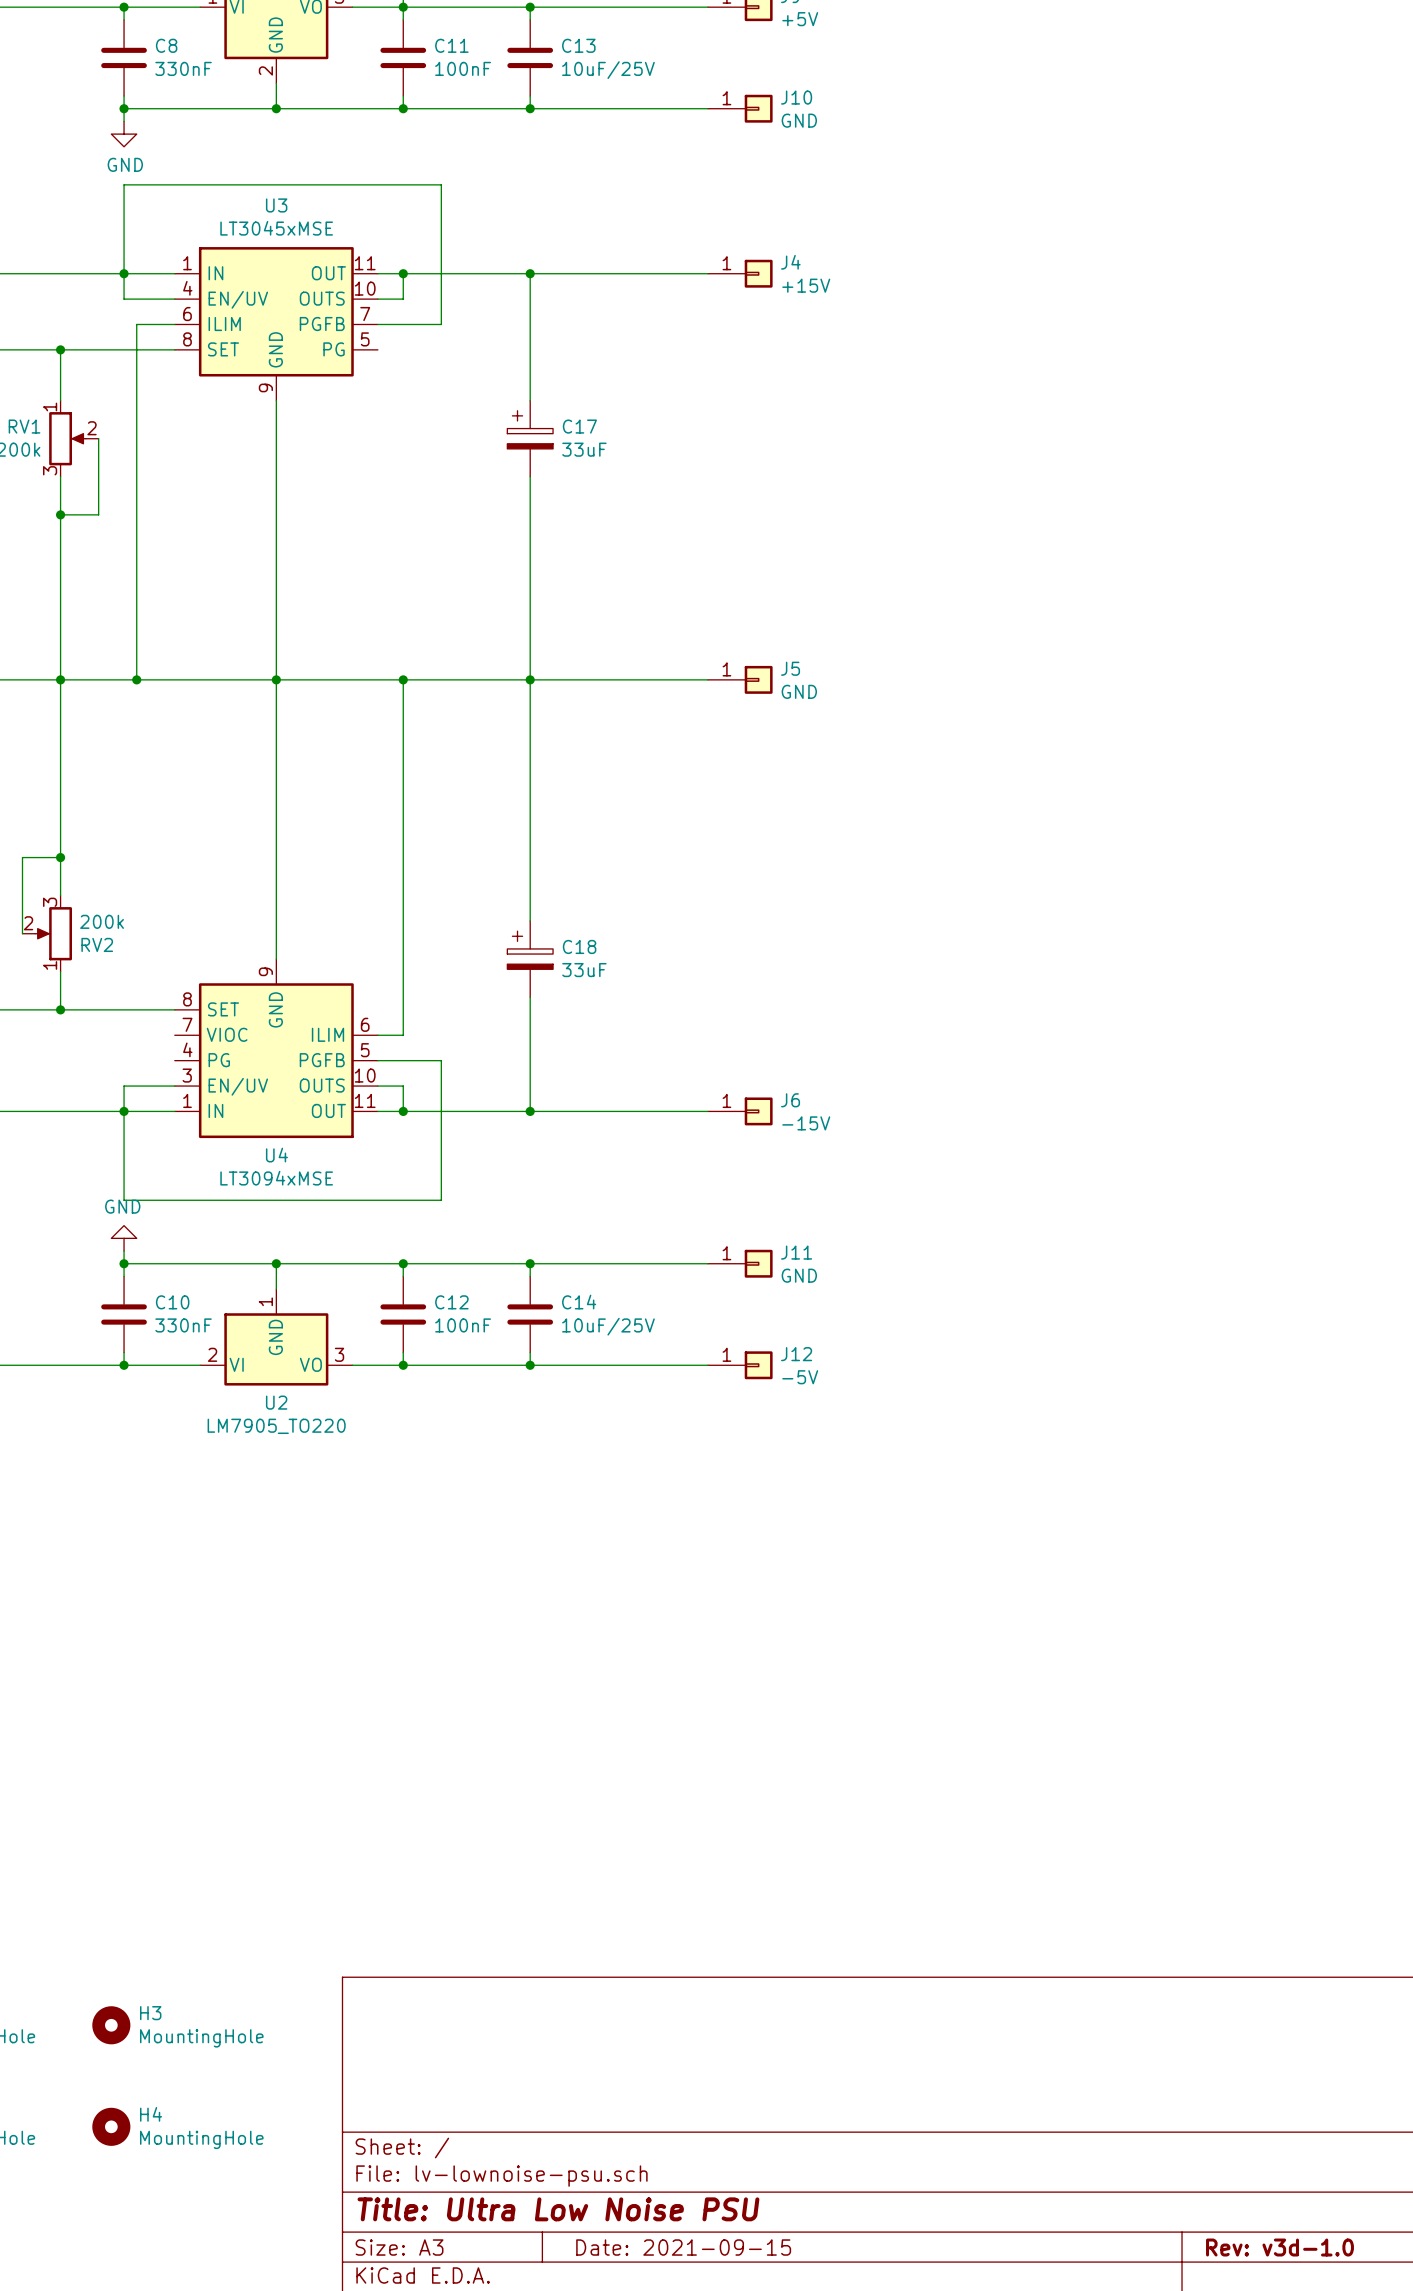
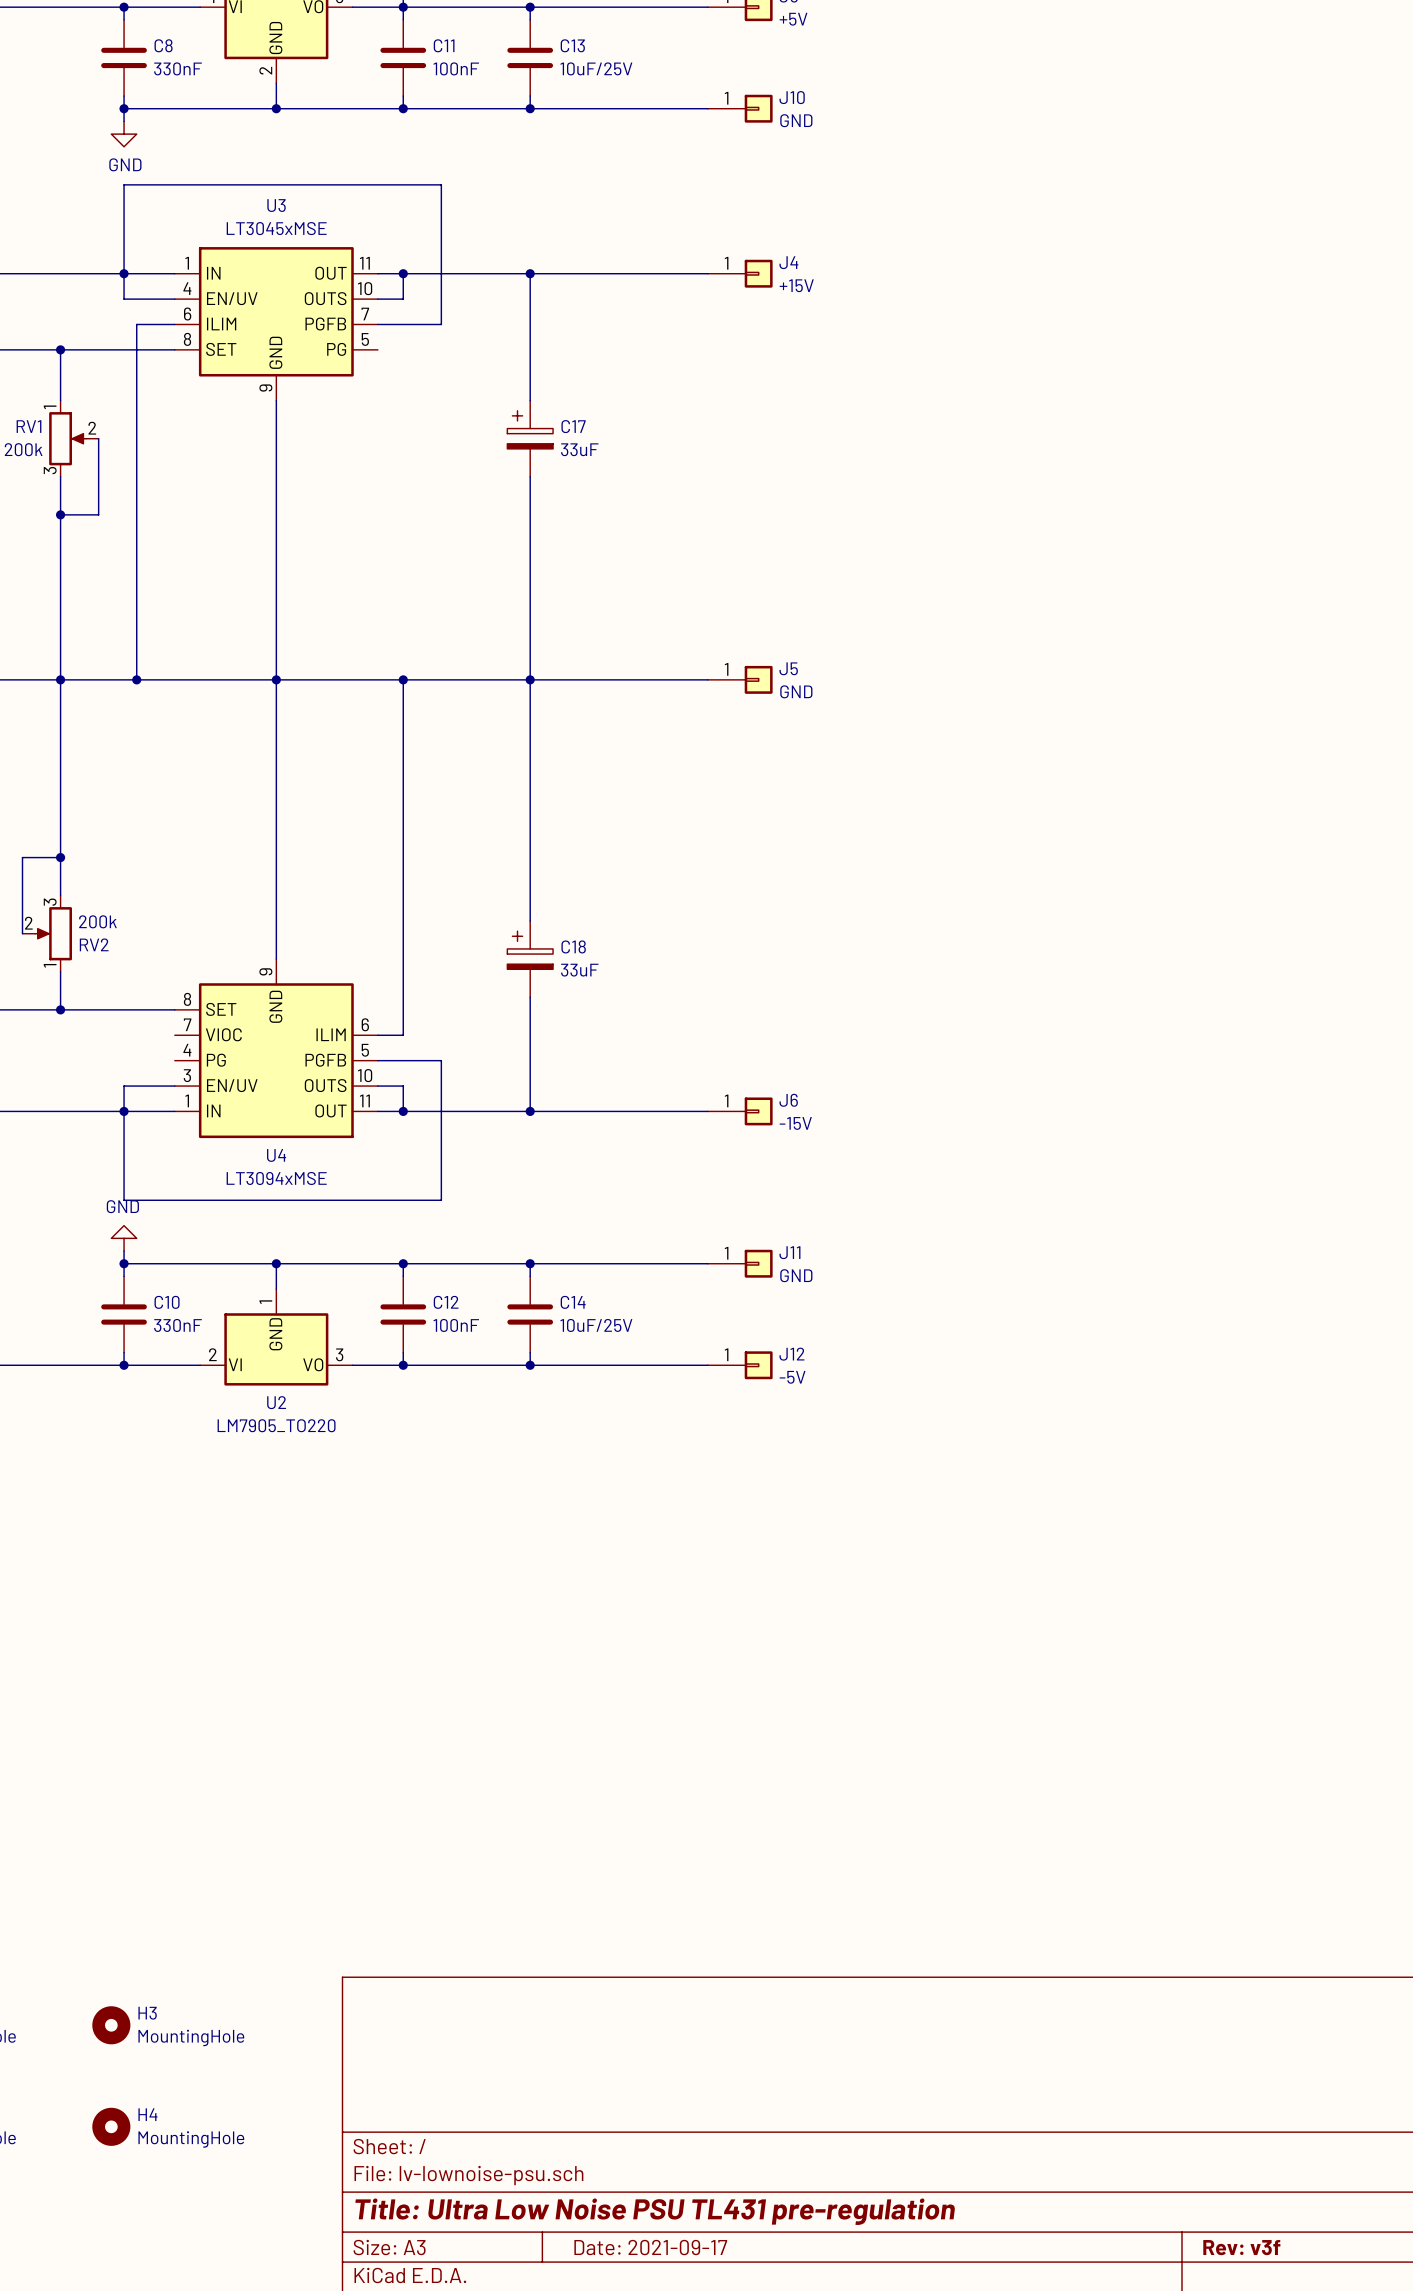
title block: Title: Ultra Low Noise PSU (558, 2209) -> Title: Ultra Low Noise PSU TL431 pre-regulation (655, 2211)
title block: Date: 2021-09-15 (683, 2247) -> Date: 2021-09-17 (650, 2247)
title block: Rev: v3d-1.0 (1279, 2247) -> Rev: v3f (1241, 2247)

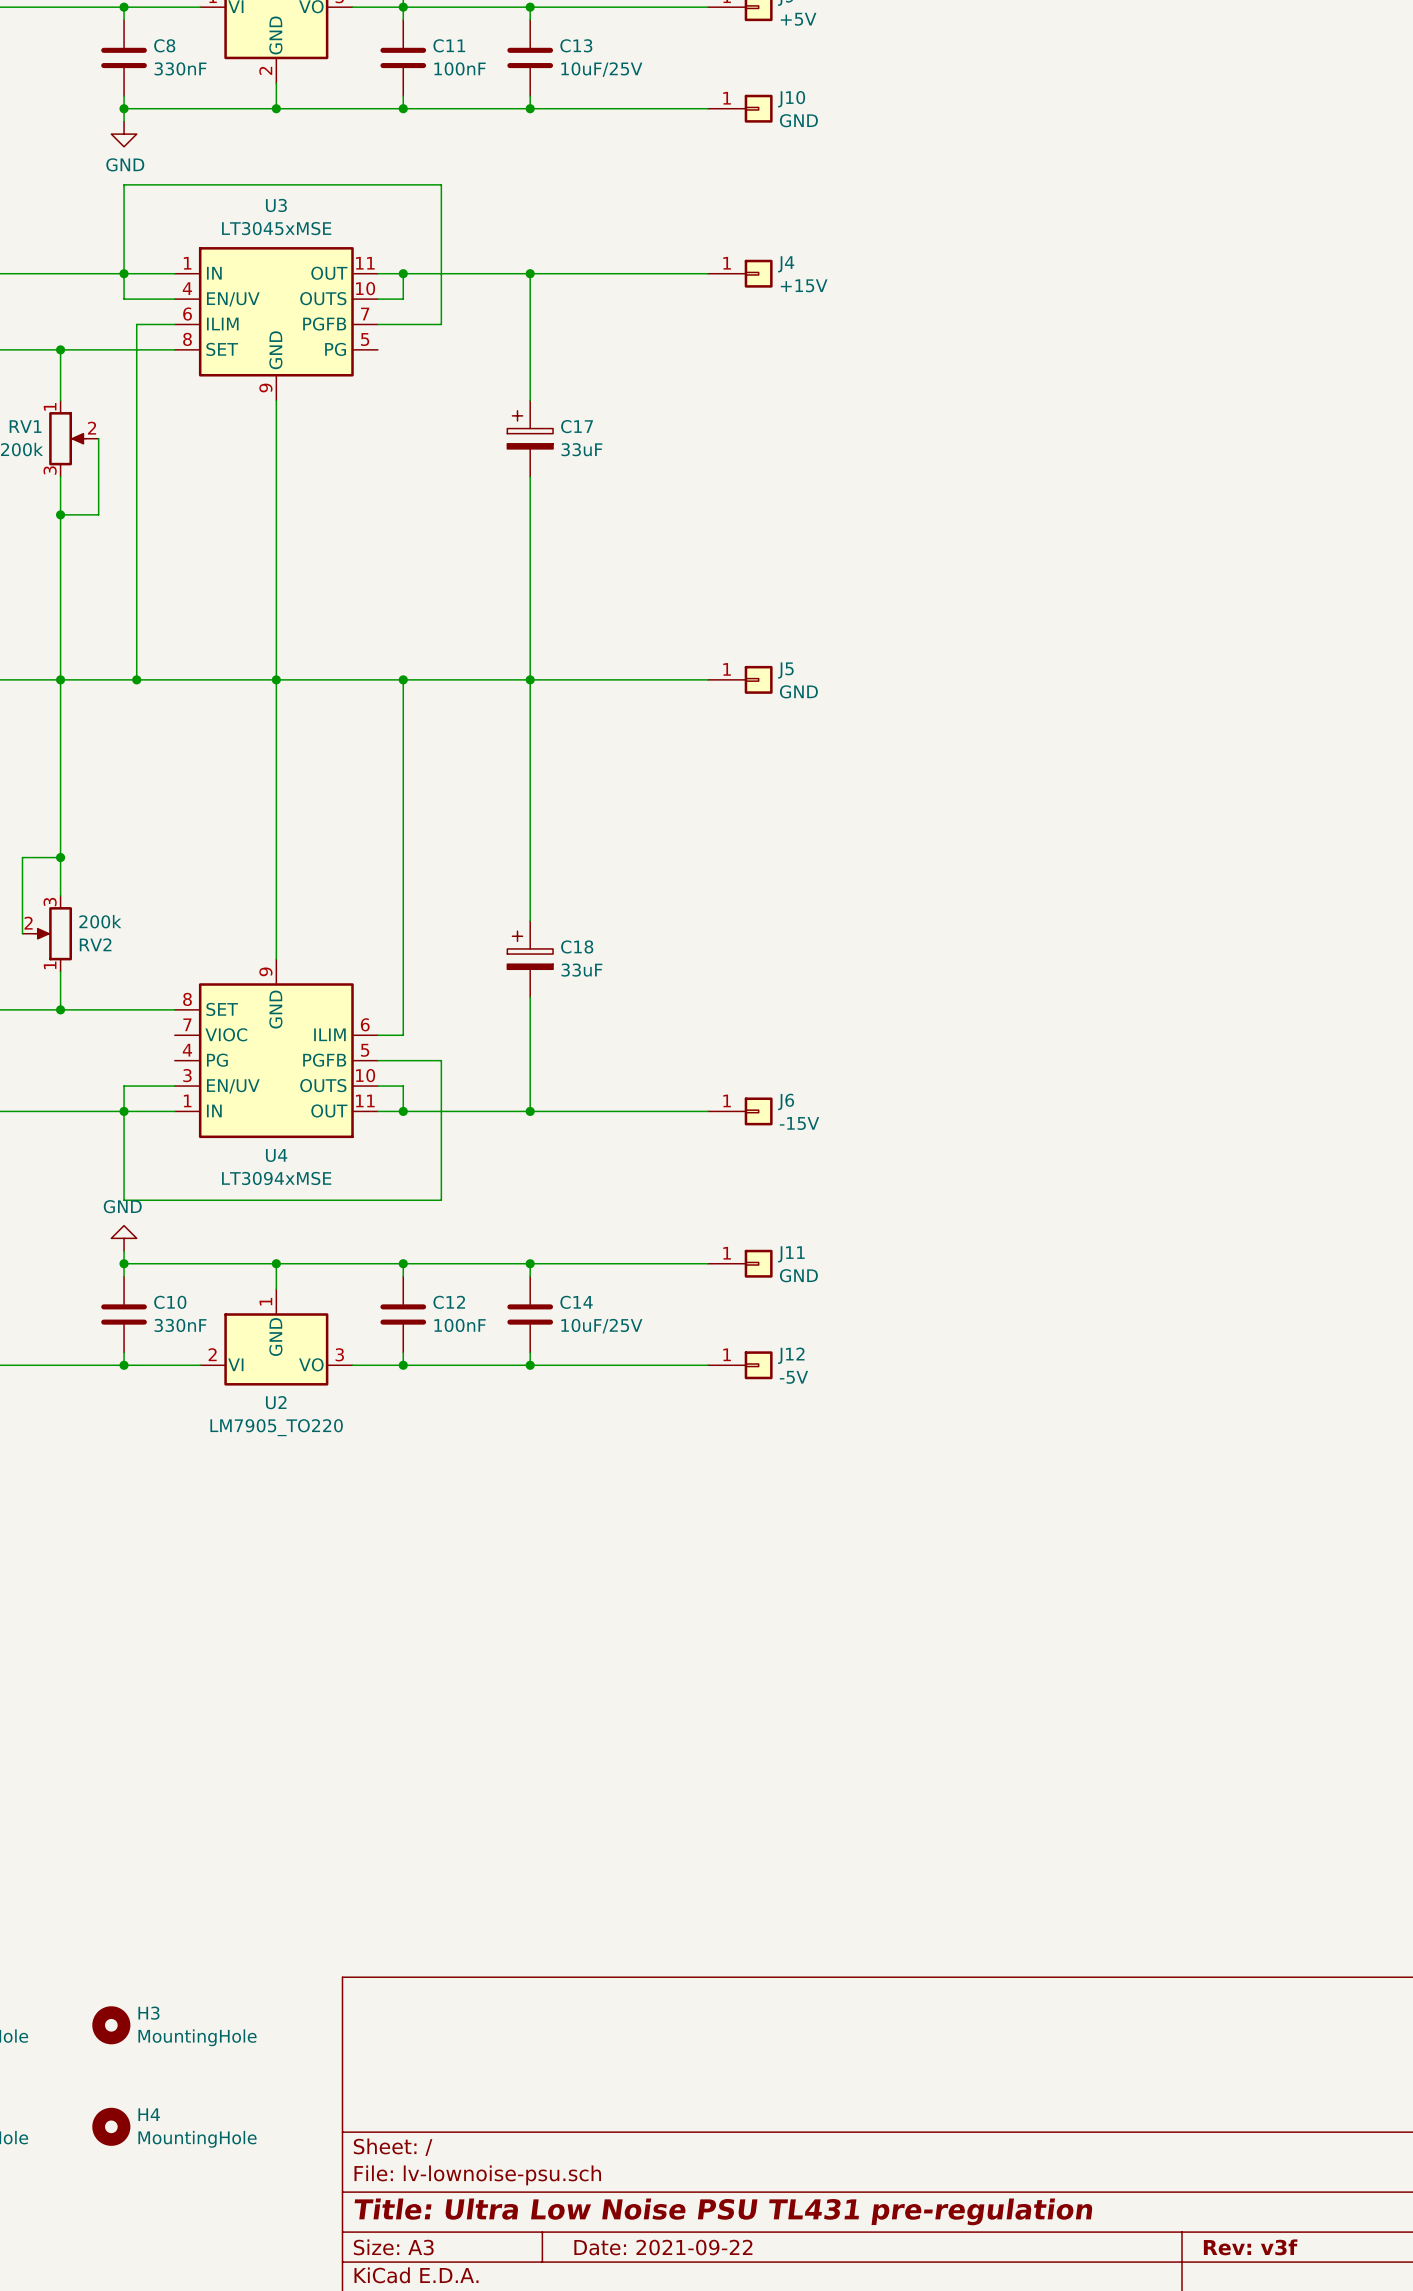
title block: Date: 2021-09-17 (650, 2247) -> Date: 2021-09-22 (663, 2247)

